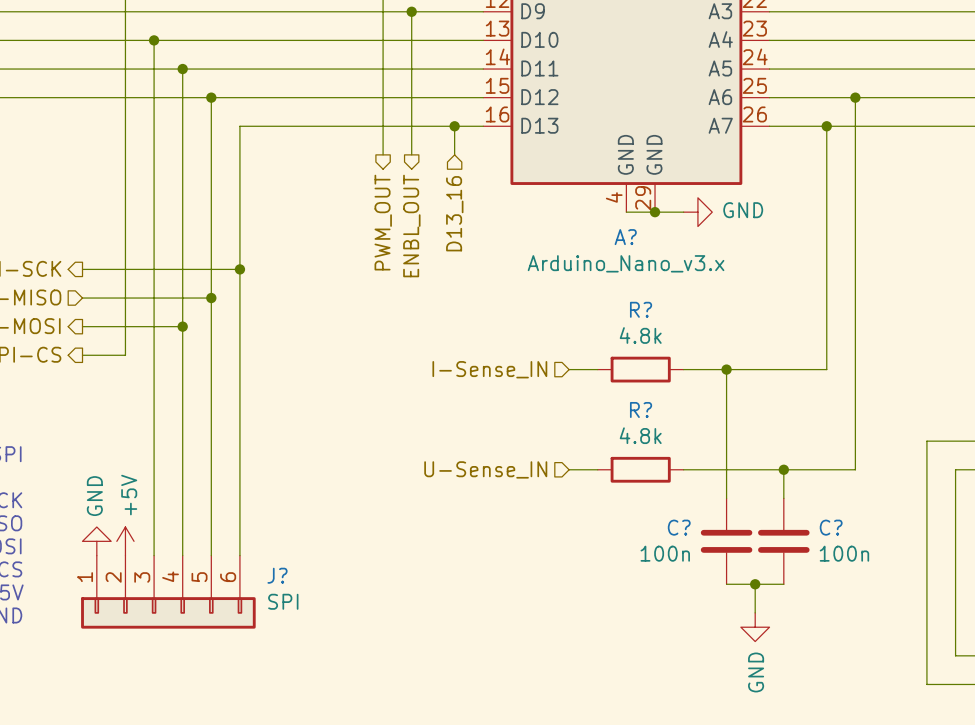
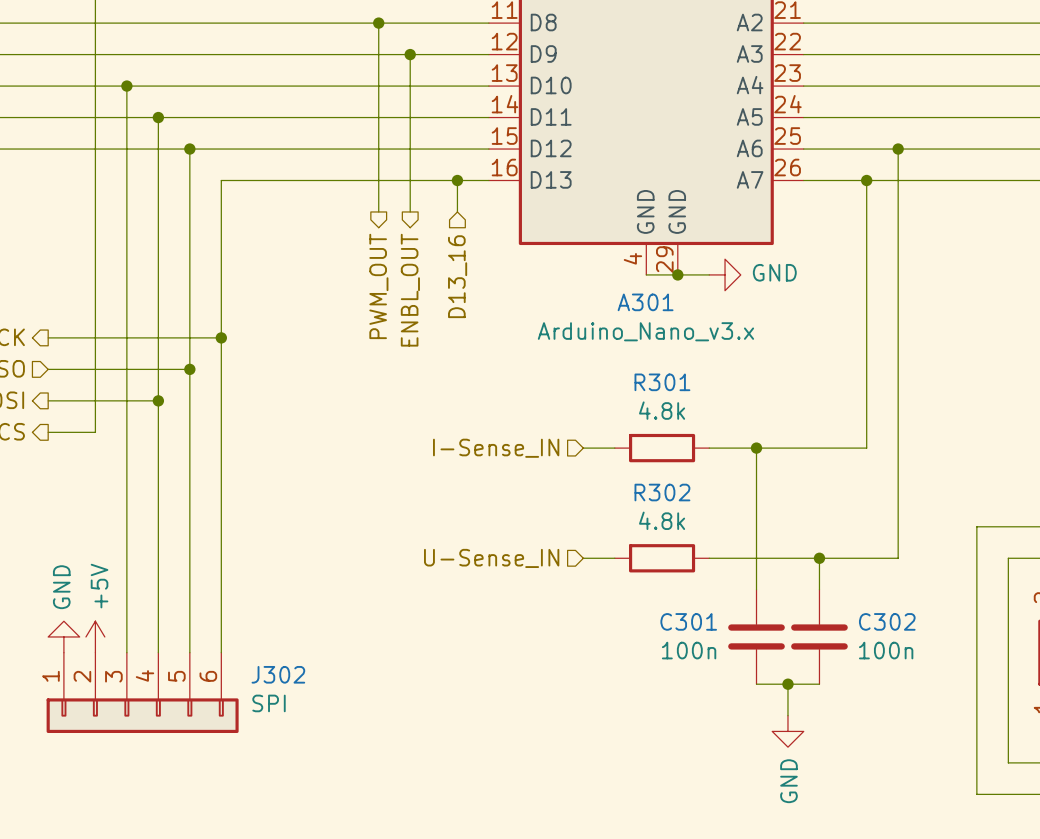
A? name: A? (625, 237) -> A301 (645, 302)
R? name: R? (641, 309) -> R301 (662, 382)
R? name: R? (641, 409) -> R302 (662, 492)
C? name: C? (679, 527) -> C301 (688, 621)
C? name: C? (831, 527) -> C302 (887, 621)
J? name: J? (277, 575) -> J302 (278, 674)

